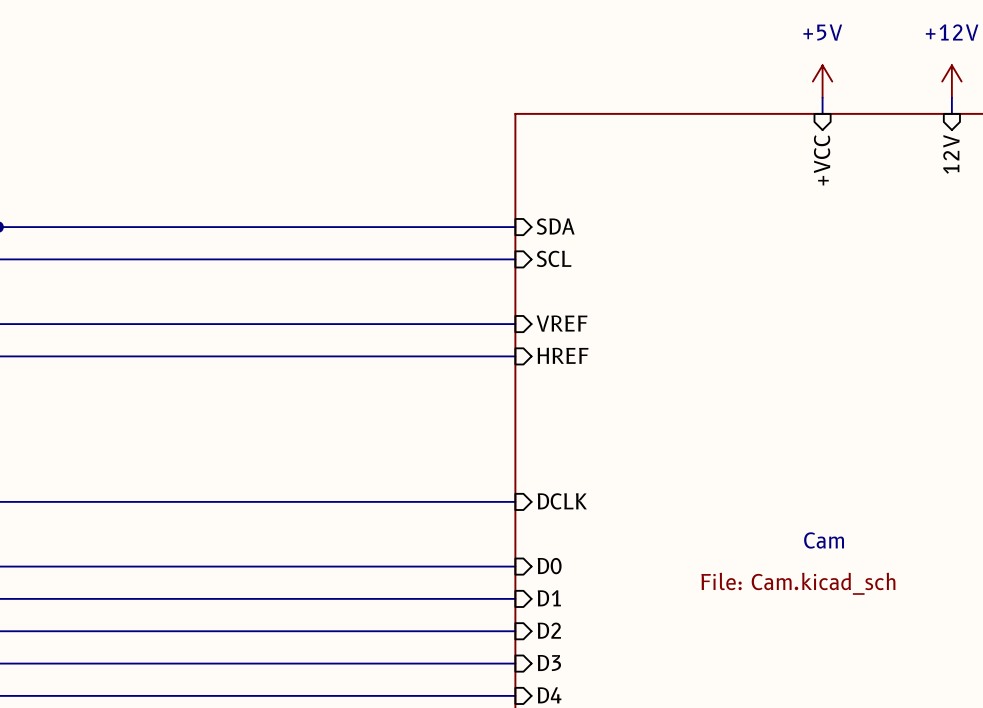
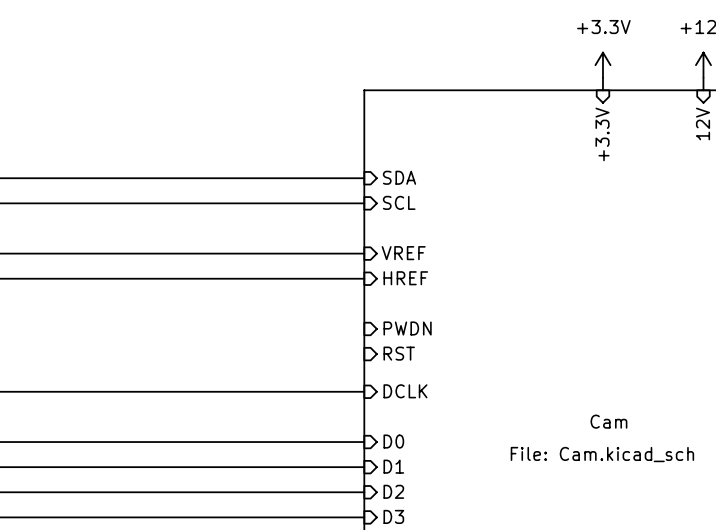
power symbol: +5V (822, 81) -> +3.3V (602, 65)
sheet pin: +VCC (822, 160) -> +3.3V (602, 134)
sheet pin: none -> PWDN (407, 328)
sheet pin: none -> RST (399, 353)

